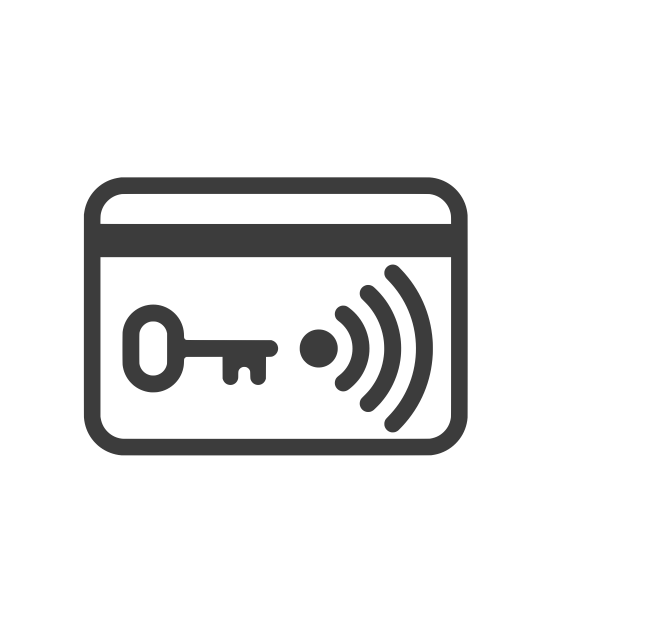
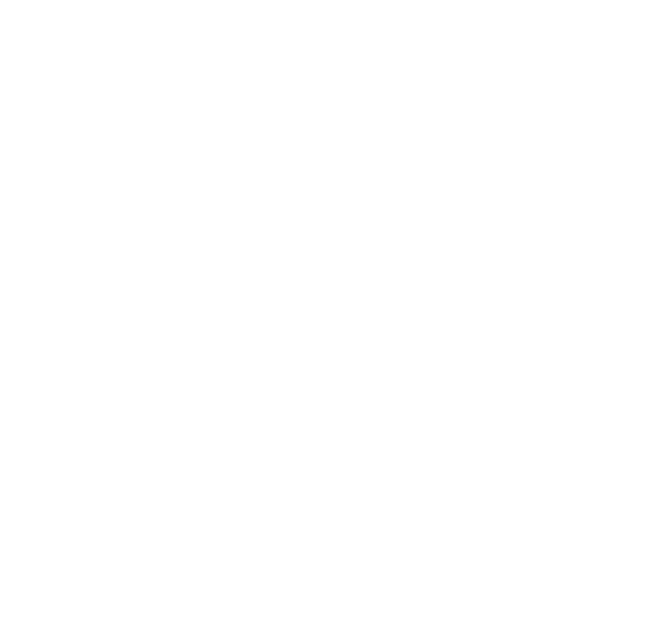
drawing: [83, 177, 468, 456] -> none

